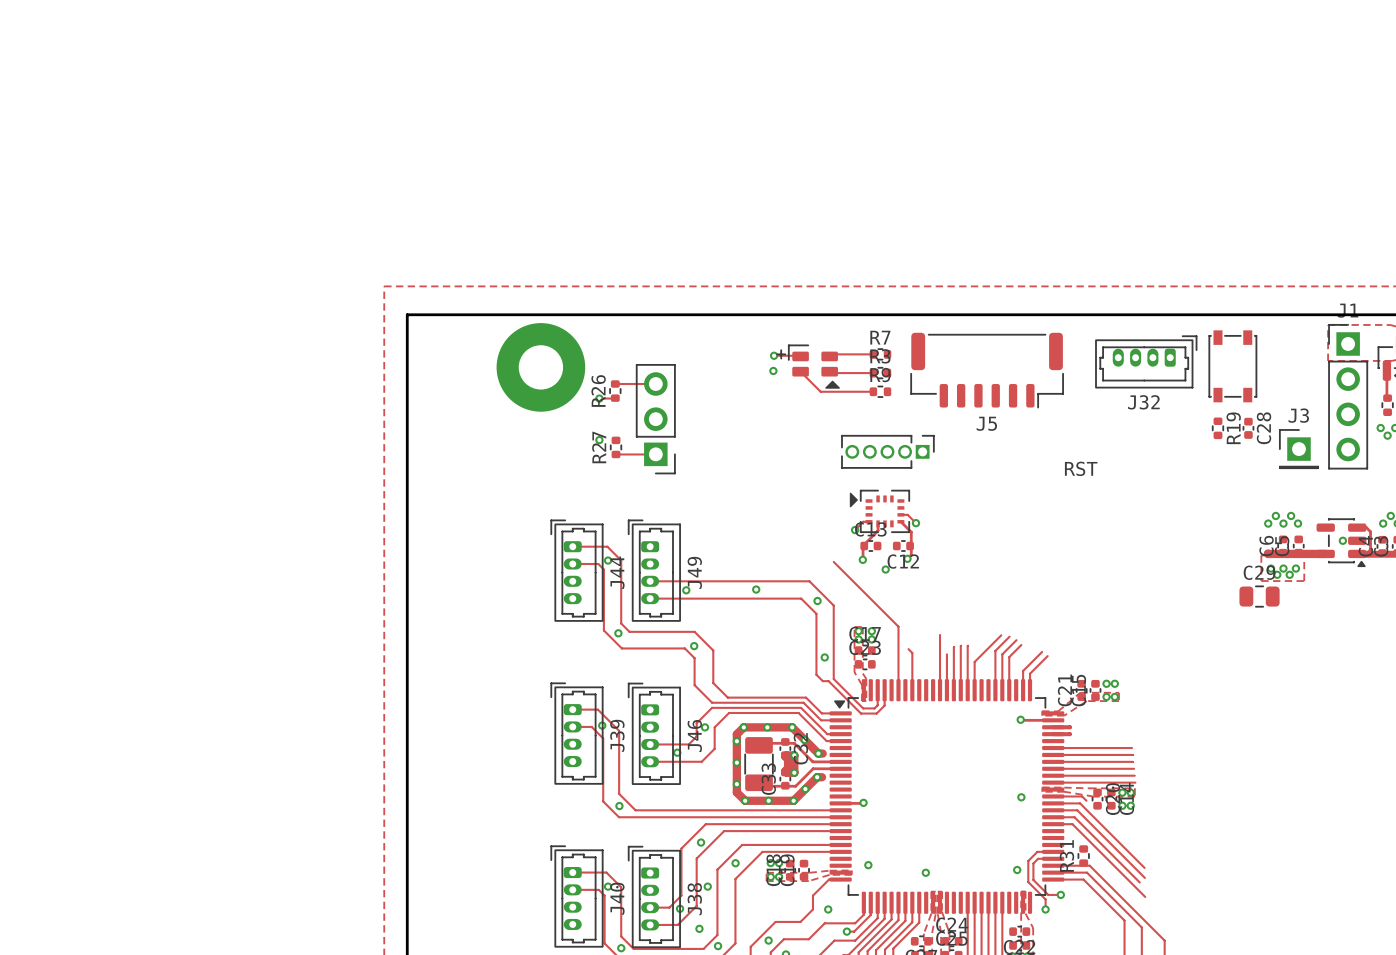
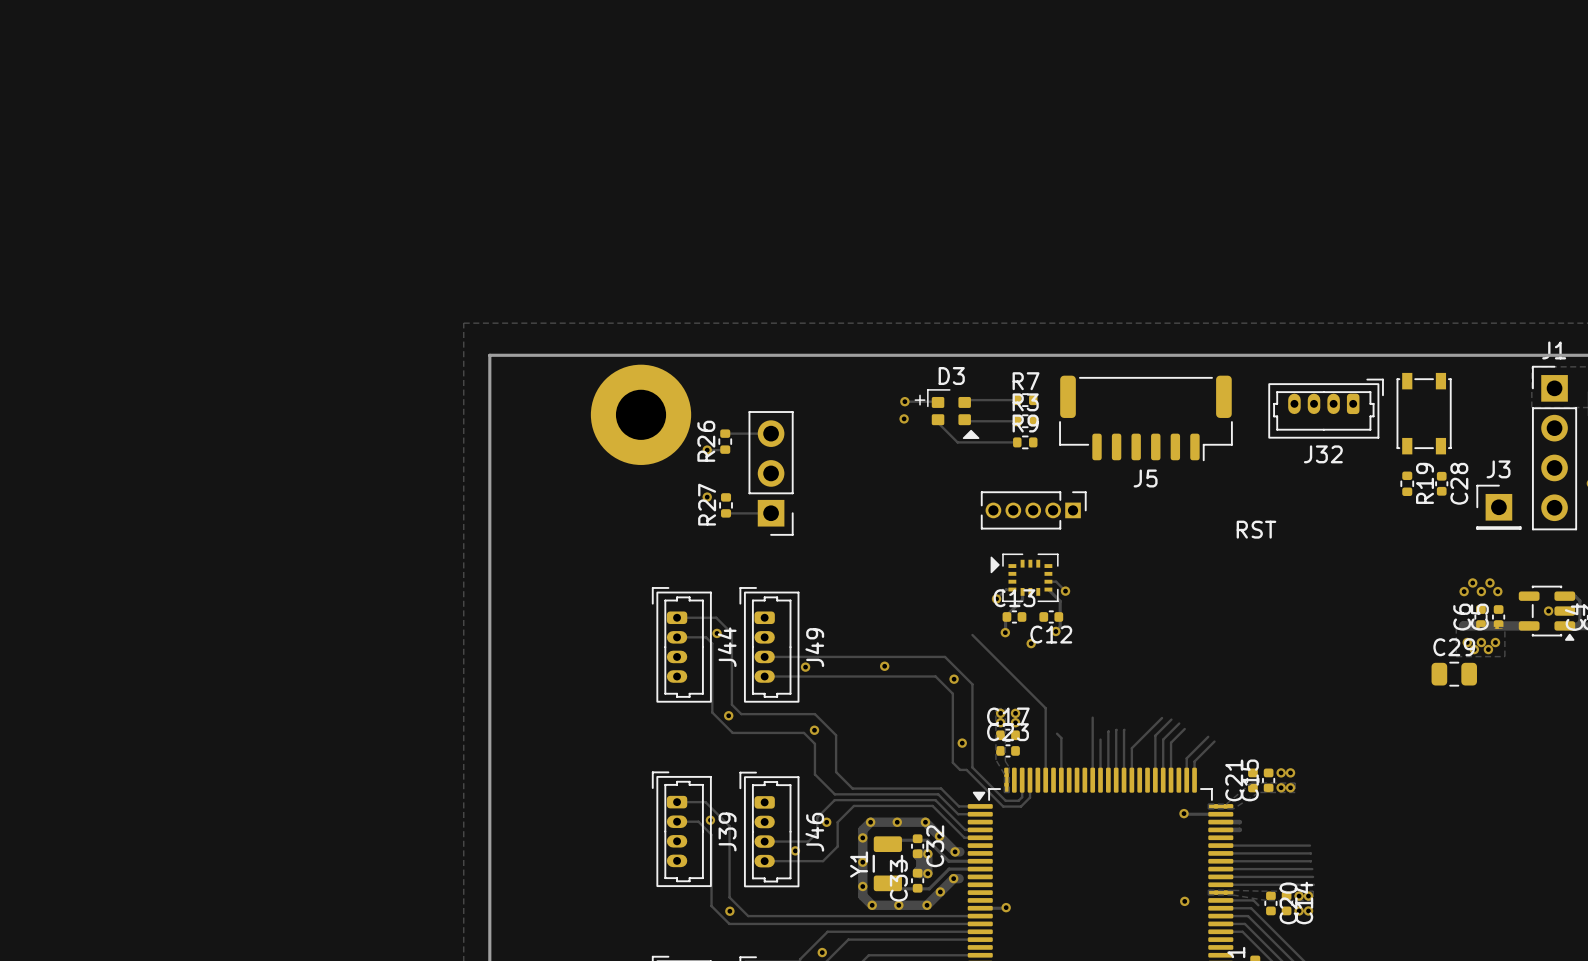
part: (808, 366) -> none
D3: none -> (946, 414)
part: (759, 764) -> none
Y1: none -> (887, 863)

